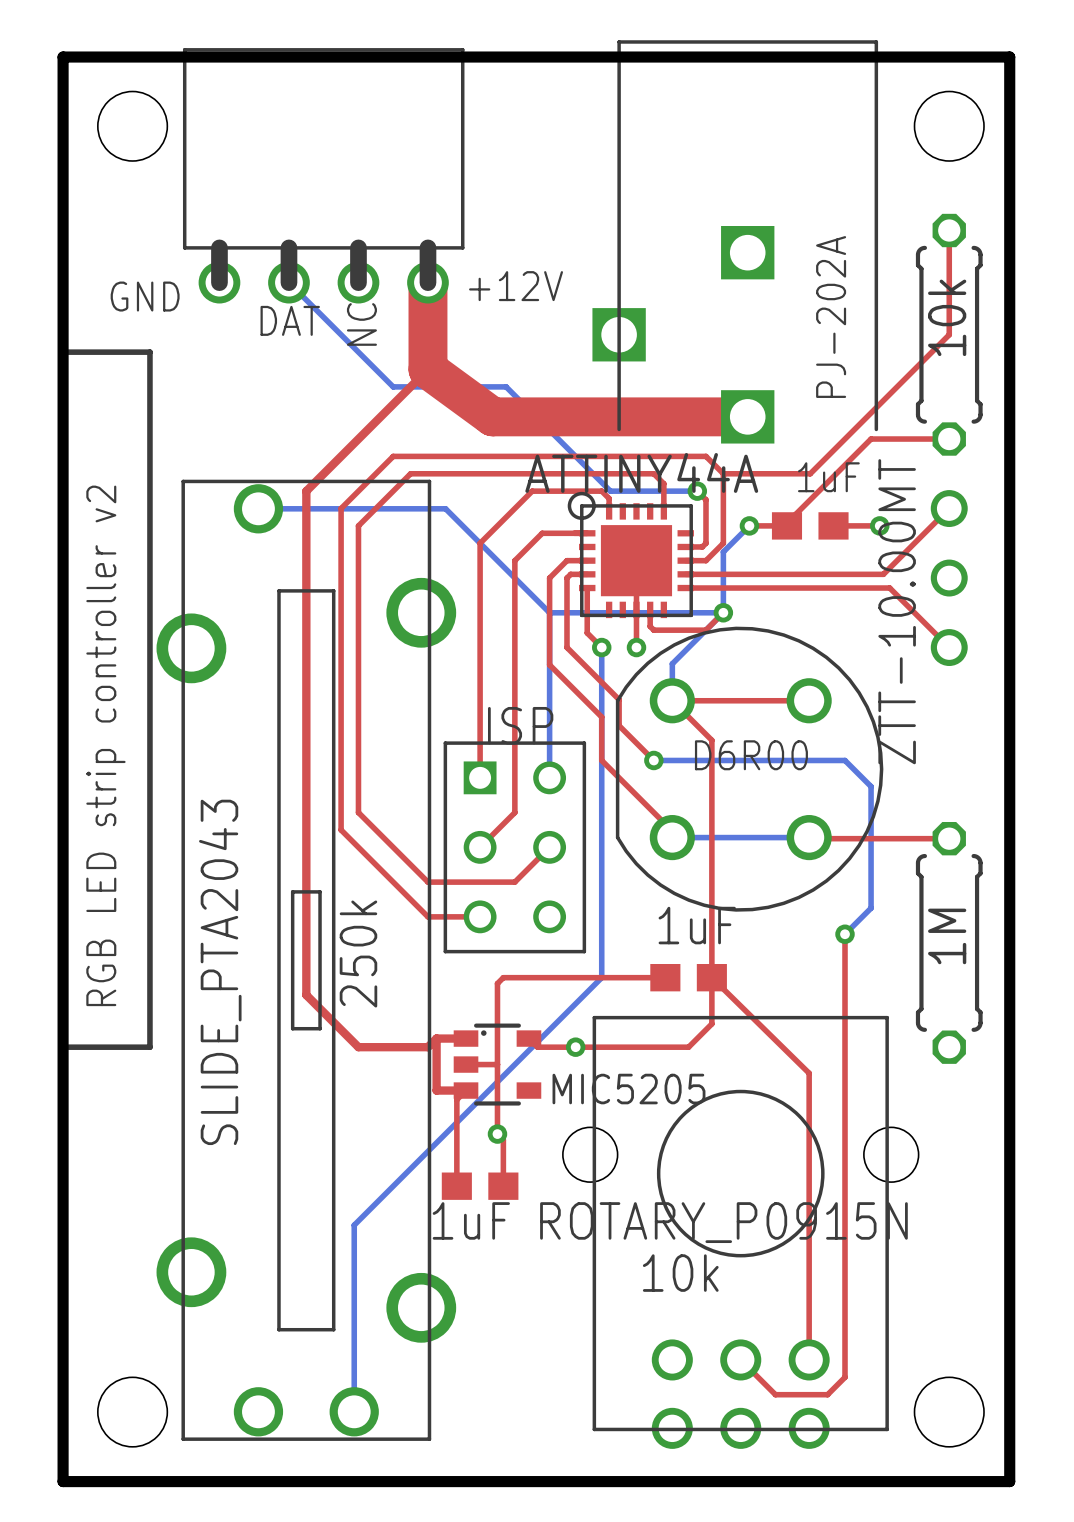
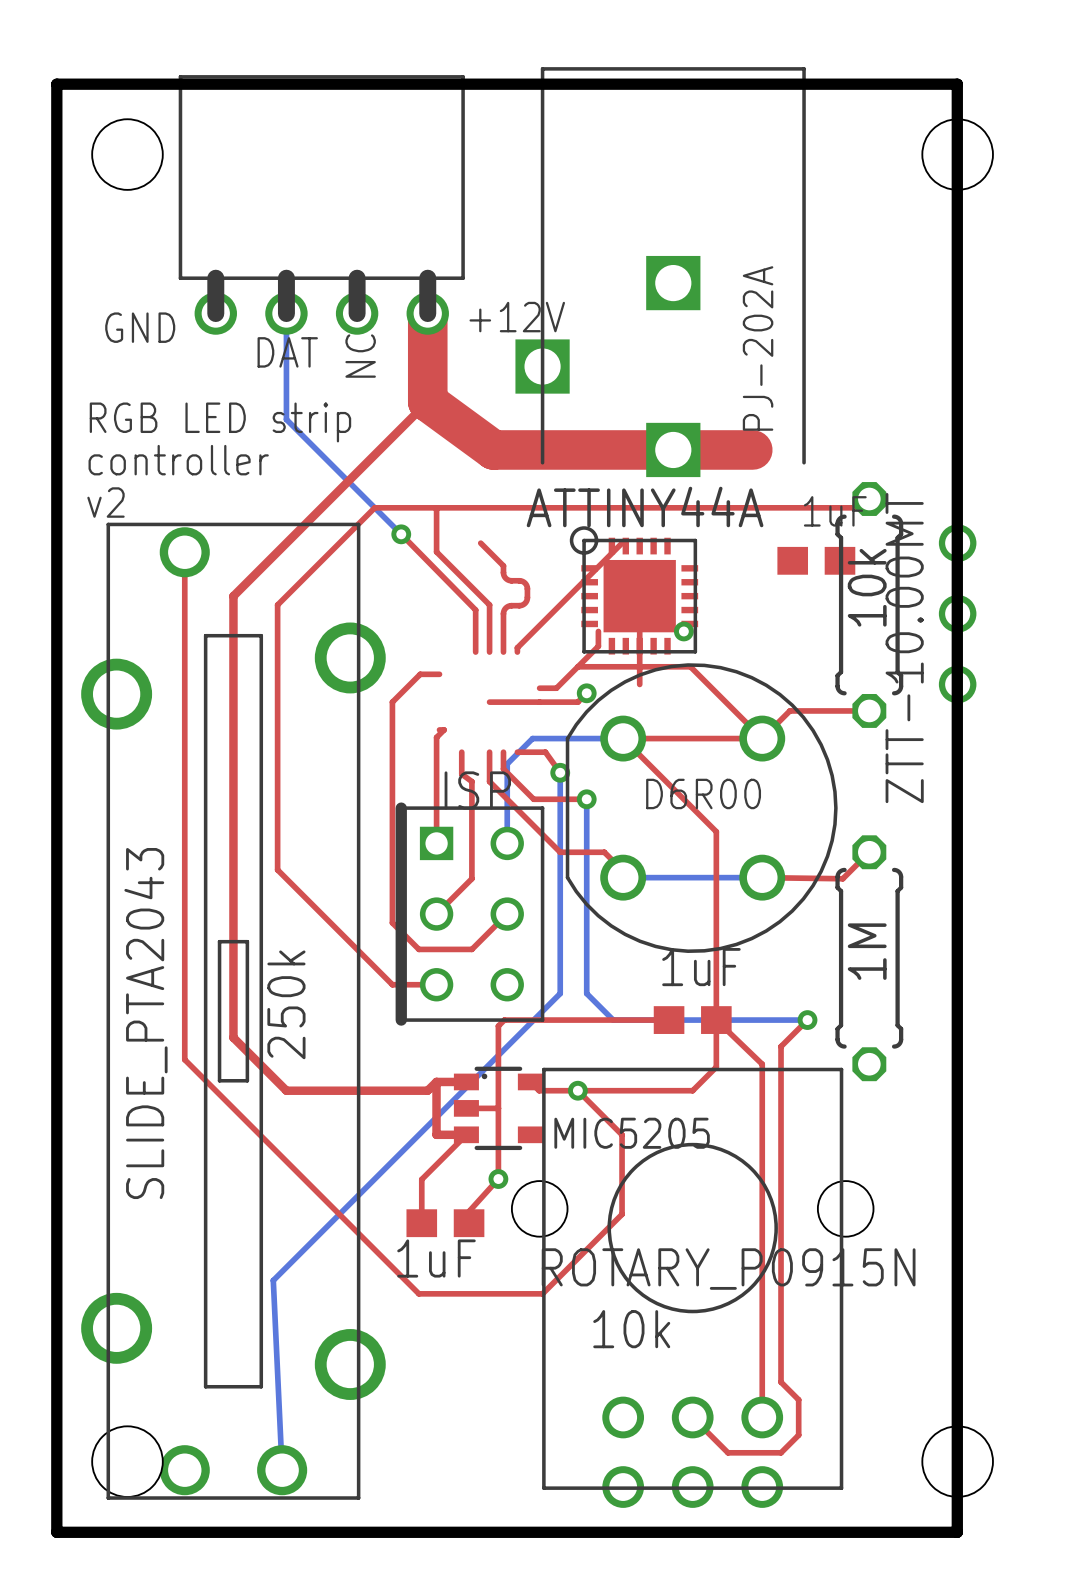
board edge: (948, 57) (1009, 57) (1009, 1481) (948, 1481) -> (957, 84) (957, 1532)
top track: (949, 230) (949, 334) (810, 473) -> (869, 499) (860, 507) (816, 507)
part position: (735, 241) -> (660, 272)
bottom track: (288, 282) (393, 386) (506, 386) (610, 491) (697, 491) -> (286, 313) (286, 419) (401, 534)
part position: (949, 334) -> (869, 604)
line: (63, 352) (149, 352) (149, 1047) (63, 1047) -> none
text: none -> controller (178, 460)
top track: (949, 439) (871, 439) (795, 514) (786, 525) (749, 525) -> none
text: none -> v2 (106, 502)
top track: (375, 473) (393, 456) (705, 456) (723, 473) (723, 543) (705, 560) (685, 560) -> (374, 507) (410, 507)
top track: (410, 473) (358, 525) (358, 812) (427, 882) (514, 882) (549, 847) -> none
top track: none -> (436, 507) (436, 551) (489, 604) (489, 652)
top track: (653, 473) (663, 483) (663, 511) -> (657, 507) (728, 507)
top track: (306, 491) (306, 995) (358, 1047) -> (304, 525) (233, 596) (233, 1037) (286, 1090) (357, 1090)
top track: (697, 491) (705, 499) (705, 543) (702, 546) (685, 546) -> none
via: (697, 491) -> none
top track: none -> (401, 534) (475, 610) (475, 652)
via: none -> (401, 534)
bottom track: (258, 508) (445, 508) (549, 612) -> none
top track: (341, 508) (341, 829) (393, 882) -> (339, 543) (277, 604) (277, 869) (392, 984) (436, 984)
top track: none -> (480, 543) (503, 565) (505, 578) (522, 581) (527, 586) (527, 598) (525, 603) (508, 606) (504, 610) (503, 652)
top track: (949, 508) (883, 574) (685, 574) -> none
top track: (609, 511) (609, 498) (601, 491) (532, 491) (480, 543) (480, 777) -> none
top track: none -> (184, 552) (184, 1059) (418, 1293) (542, 1293) (622, 1214) (622, 1134) (577, 1090)
bottom track: (749, 525) (723, 551) (723, 612) -> none
via: (749, 525) -> none
top track: (833, 525) (879, 525) -> none
via: (879, 525) -> none
top track: (587, 533) (542, 533) (514, 560) (514, 812) (480, 847) -> none
top track: (566, 560) (587, 560) -> (569, 596) (622, 543)
top track: (587, 574) (570, 574) (566, 578) (566, 647) (619, 699) (619, 725) (653, 760) -> none
top track: (549, 578) (549, 664) (601, 717) (601, 760) (672, 831) (672, 837) -> (551, 613) (517, 647) (517, 652)
top track: (587, 588) (587, 633) (601, 647) -> none
top track: (685, 588) (889, 588) (949, 647) -> none
top track: none -> (598, 631) (598, 646) (556, 688) (539, 688)
via: none -> (683, 631)
top track: (650, 609) (650, 626) (653, 630) -> (577, 666) (657, 666)
bottom track: (549, 612) (723, 612) -> none
bottom track: (549, 612) (549, 777) -> none
top track: (723, 612) (705, 630) (686, 630) -> (869, 710) (789, 710) (762, 738) (690, 666)
bottom track: (723, 612) (672, 663) (672, 700) -> none
via: (723, 612) -> none
top track: none -> (439, 674) (420, 674) (392, 702) (392, 922)
bottom track: (601, 647) (601, 977) (354, 1225) (354, 1411) -> none
via position: (601, 647) -> (586, 693)
via: (636, 647) -> none
top track: none -> (586, 693) (577, 702) (489, 702)
top track: none -> (439, 729) (444, 729) (436, 737) (436, 843)
bottom track: none -> (623, 738) (532, 738) (507, 763) (507, 843)
top track: (672, 700) (711, 740) (711, 792) -> (676, 738) (623, 738) (716, 831)
top track: (757, 700) (809, 700) -> none
top track: none -> (461, 752) (461, 774) (471, 781) (471, 878) (436, 914)
top track: none -> (489, 752) (489, 781) (560, 852) (604, 852) (623, 871) (623, 877)
top track: none -> (503, 752) (503, 769) (533, 799) (586, 799)
top track: none -> (517, 752) (545, 752) (560, 772)
bottom track: none -> (560, 772) (560, 993) (273, 1280) (282, 1470)
via: none -> (560, 772)
text: RGB LED strip controller v2 (105, 745) -> RGB LED strip (220, 422)
bottom track: none -> (586, 799) (586, 993) (613, 1020) (807, 1020)
via: none -> (586, 799)
bottom track: (653, 760) (845, 760) (871, 786) (871, 908) (845, 934) -> none
via: (653, 760) -> none
line: none -> (401, 808) (401, 1020)
part position: (749, 769) -> (701, 808)
top track: none -> (869, 852) (842, 878) (762, 877)
bottom track: (757, 837) (809, 837) -> (623, 877) (676, 877)
top track: (809, 837) (949, 838) -> none
part position: (514, 847) -> (471, 914)
top track: (419, 908) (427, 916) (480, 916) -> (418, 949) (471, 949) (507, 914)
top track: (845, 934) (845, 1377) (827, 1394) (775, 1394) (740, 1359) -> none
via position: (845, 934) -> (807, 1020)
part position: (949, 942) -> (869, 958)
SLIDE_PTA2043 position: (306, 960) -> (233, 1011)
top track: (711, 977) (809, 1073) (809, 1359) -> (716, 1020) (762, 1064) (762, 1417)
top track: none -> (807, 1020) (781, 1046) (781, 1382) (798, 1399) (798, 1435) (781, 1452) (728, 1452) (692, 1417)
top track: (456, 1099) (456, 1186) -> (457, 1144) (421, 1179) (421, 1223)
top track: (497, 1134) (503, 1139) (503, 1186) -> (498, 1179) (469, 1211) (469, 1223)
part position: (480, 1186) -> (445, 1223)
ROTARY_P0915N position: (740, 1232) -> (692, 1287)

